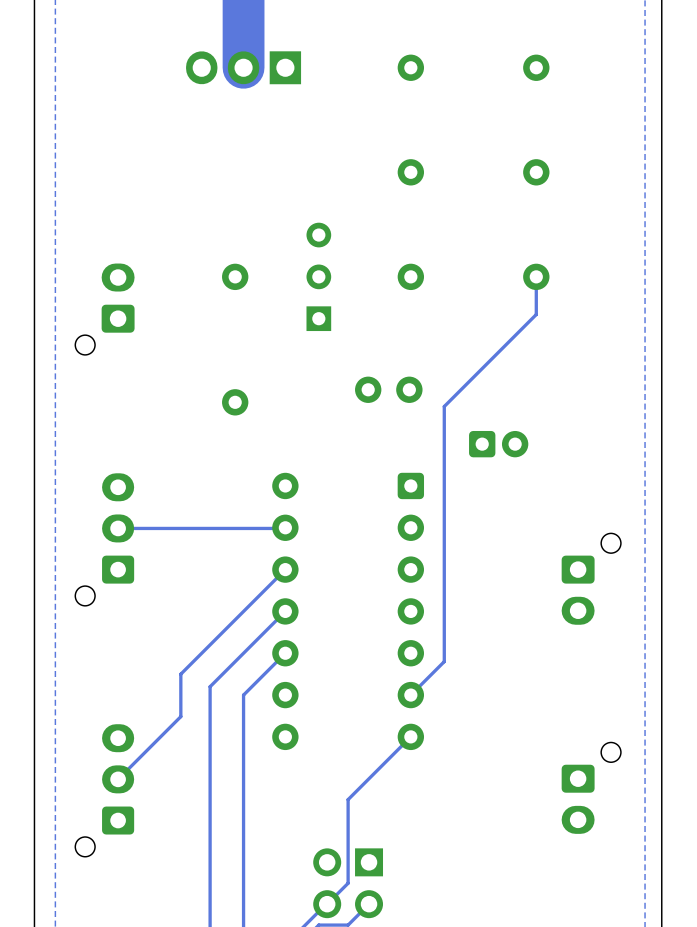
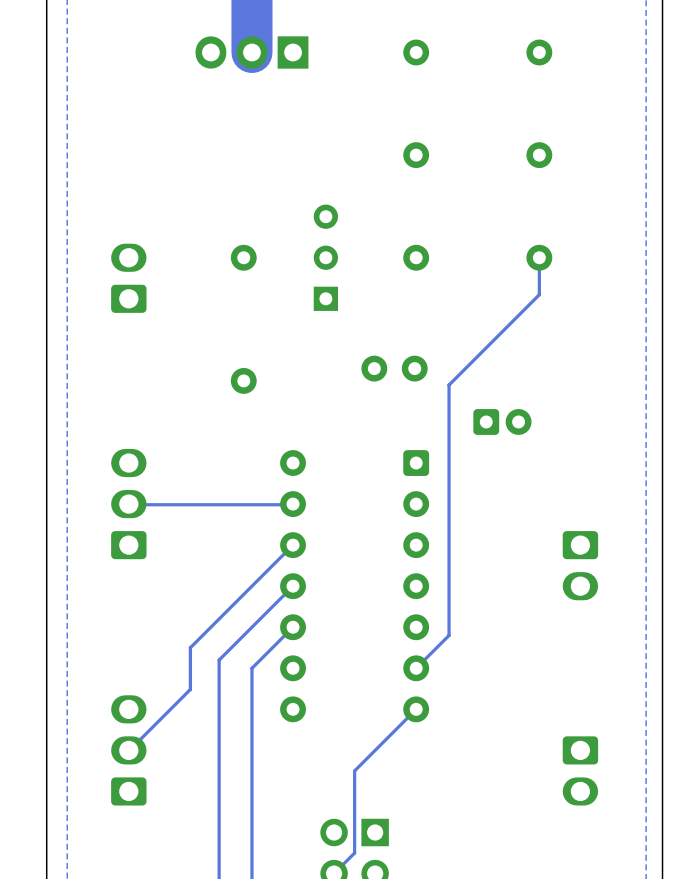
part: none -> (128, 278)
part: (104, 309) -> none
part: none -> (128, 504)
part: (104, 539) -> none
part: (591, 579) -> none
part: none -> (580, 565)
part: none -> (128, 750)
part: (591, 788) -> none
part: (104, 790) -> none
part: none -> (580, 770)

